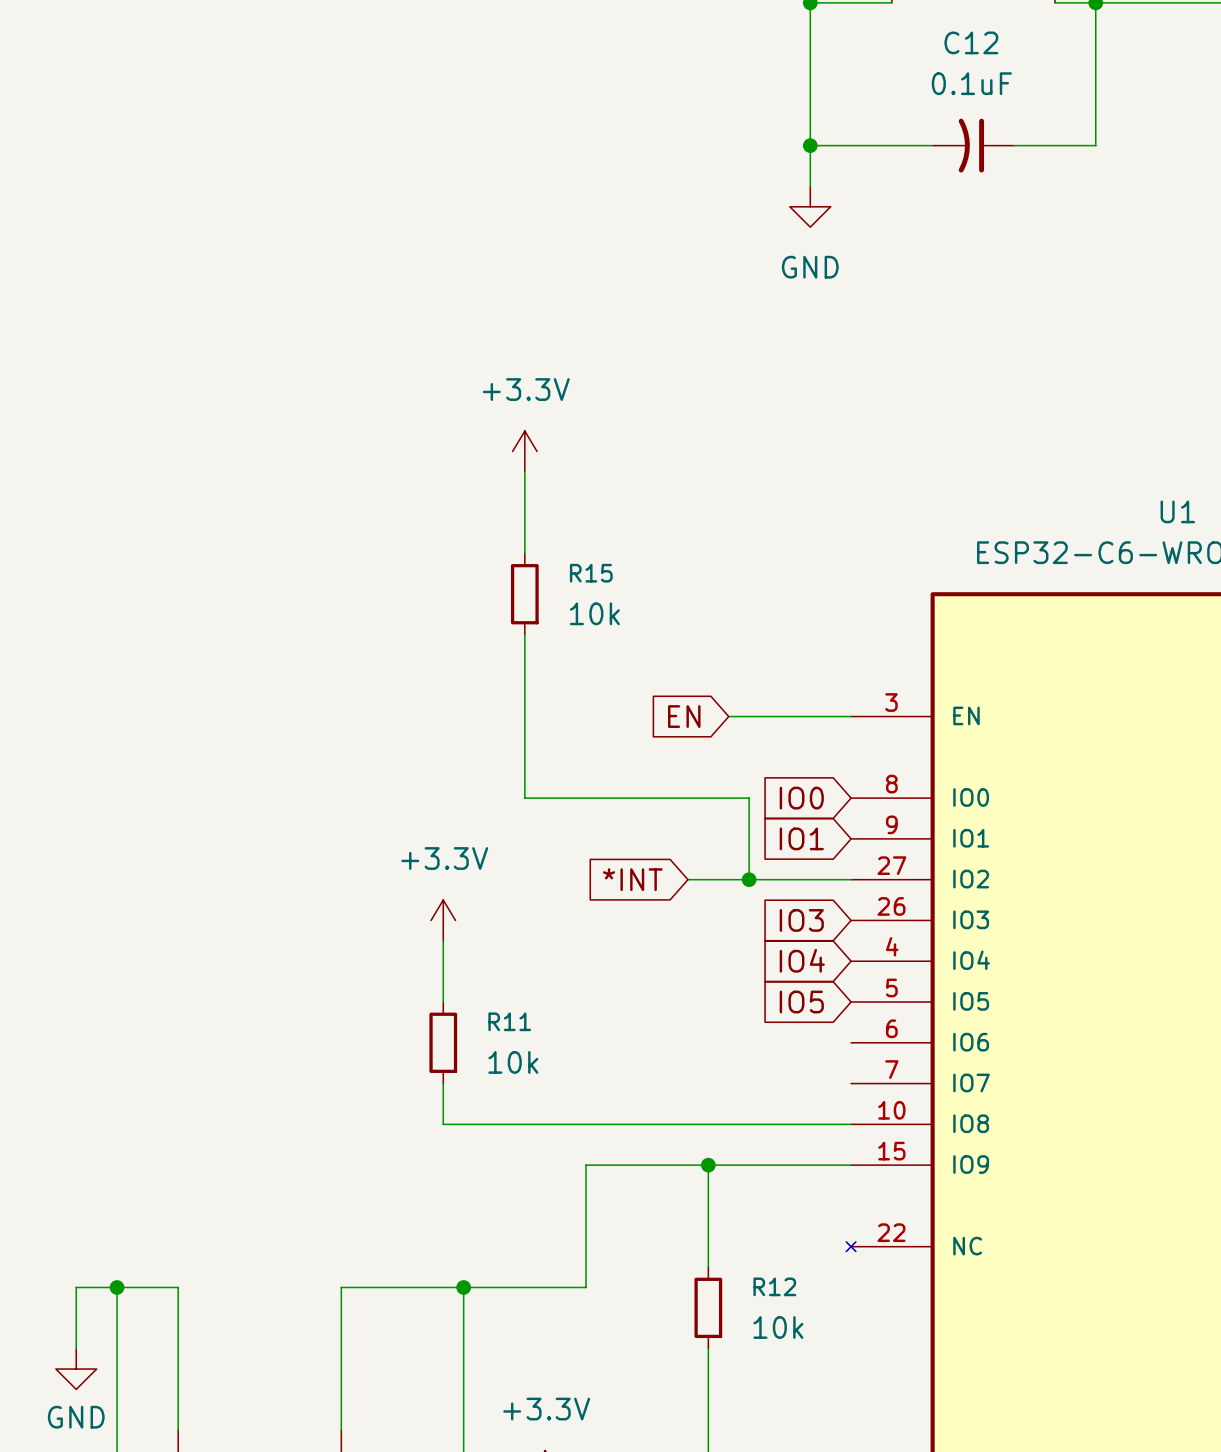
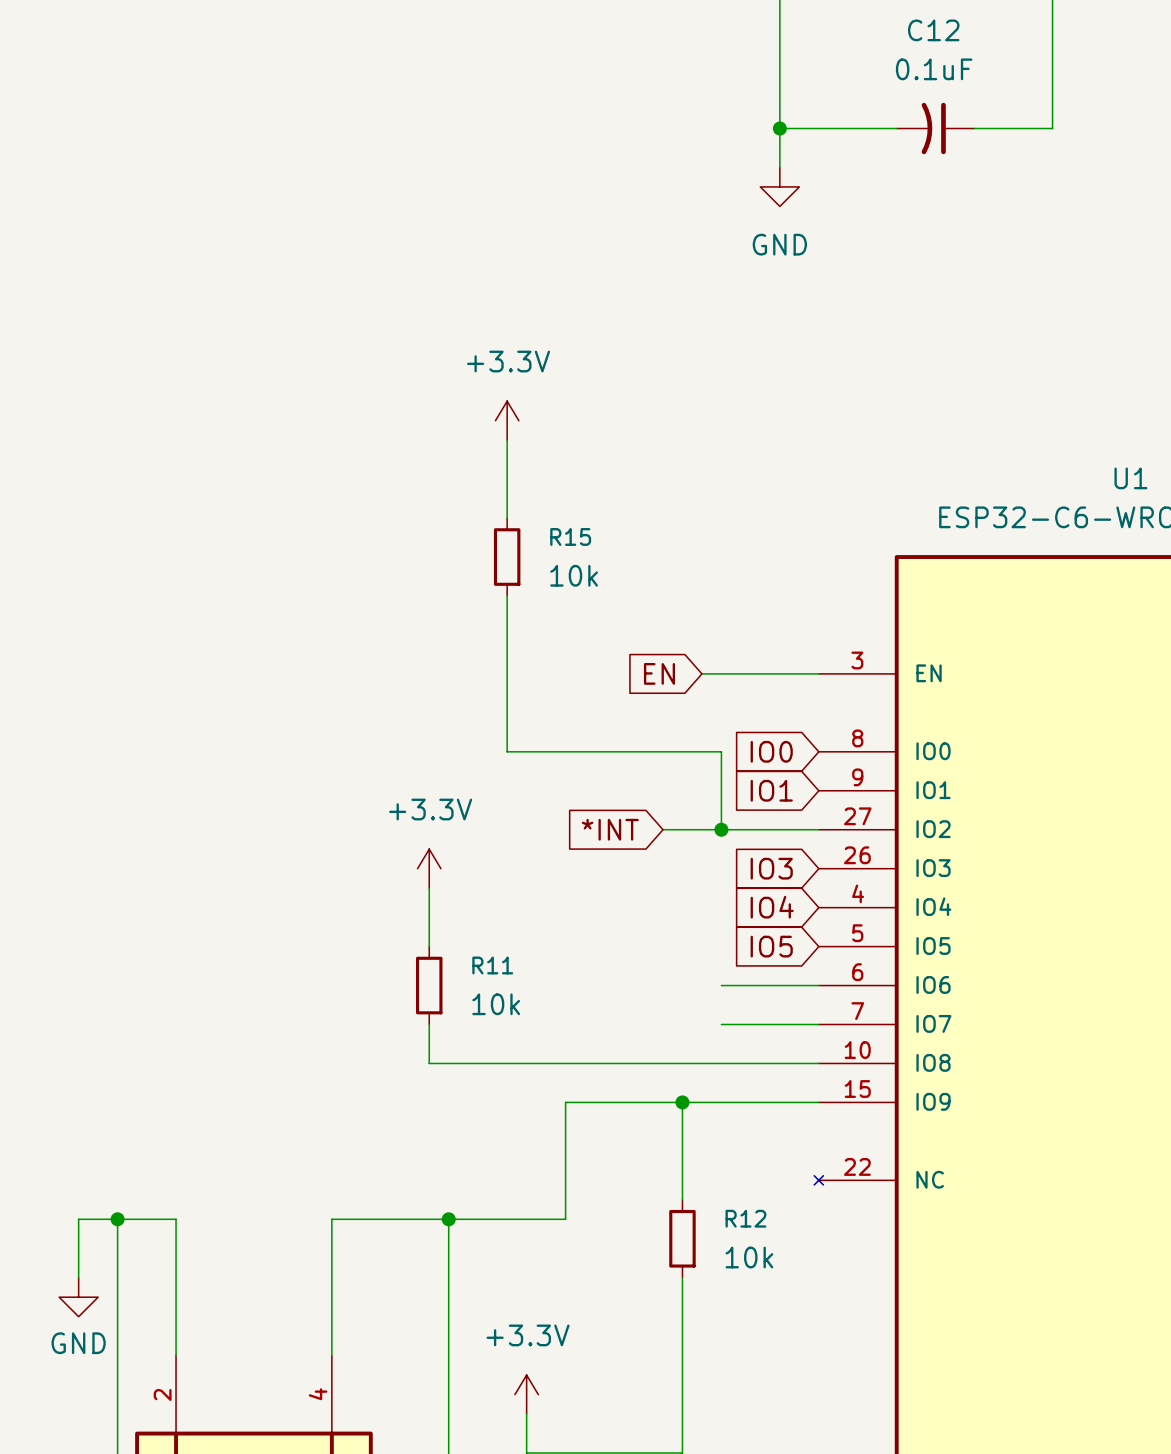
wire: none -> (721, 985) (818, 985)
wire: none -> (721, 1024) (818, 1024)

